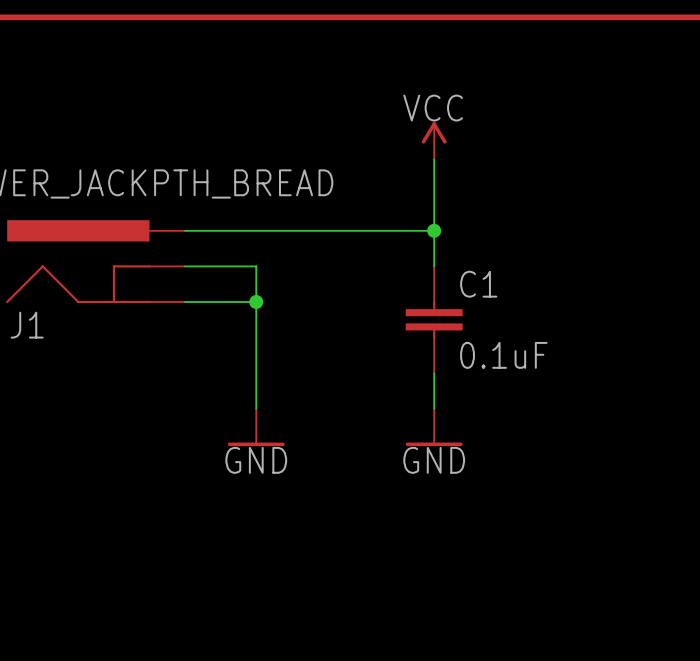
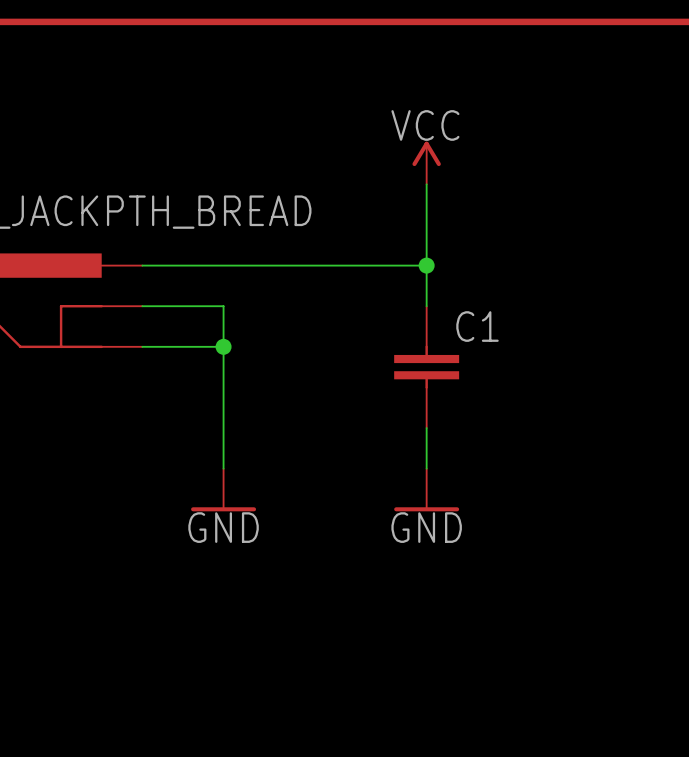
C1 value: 0.1uF (503, 355) -> none

